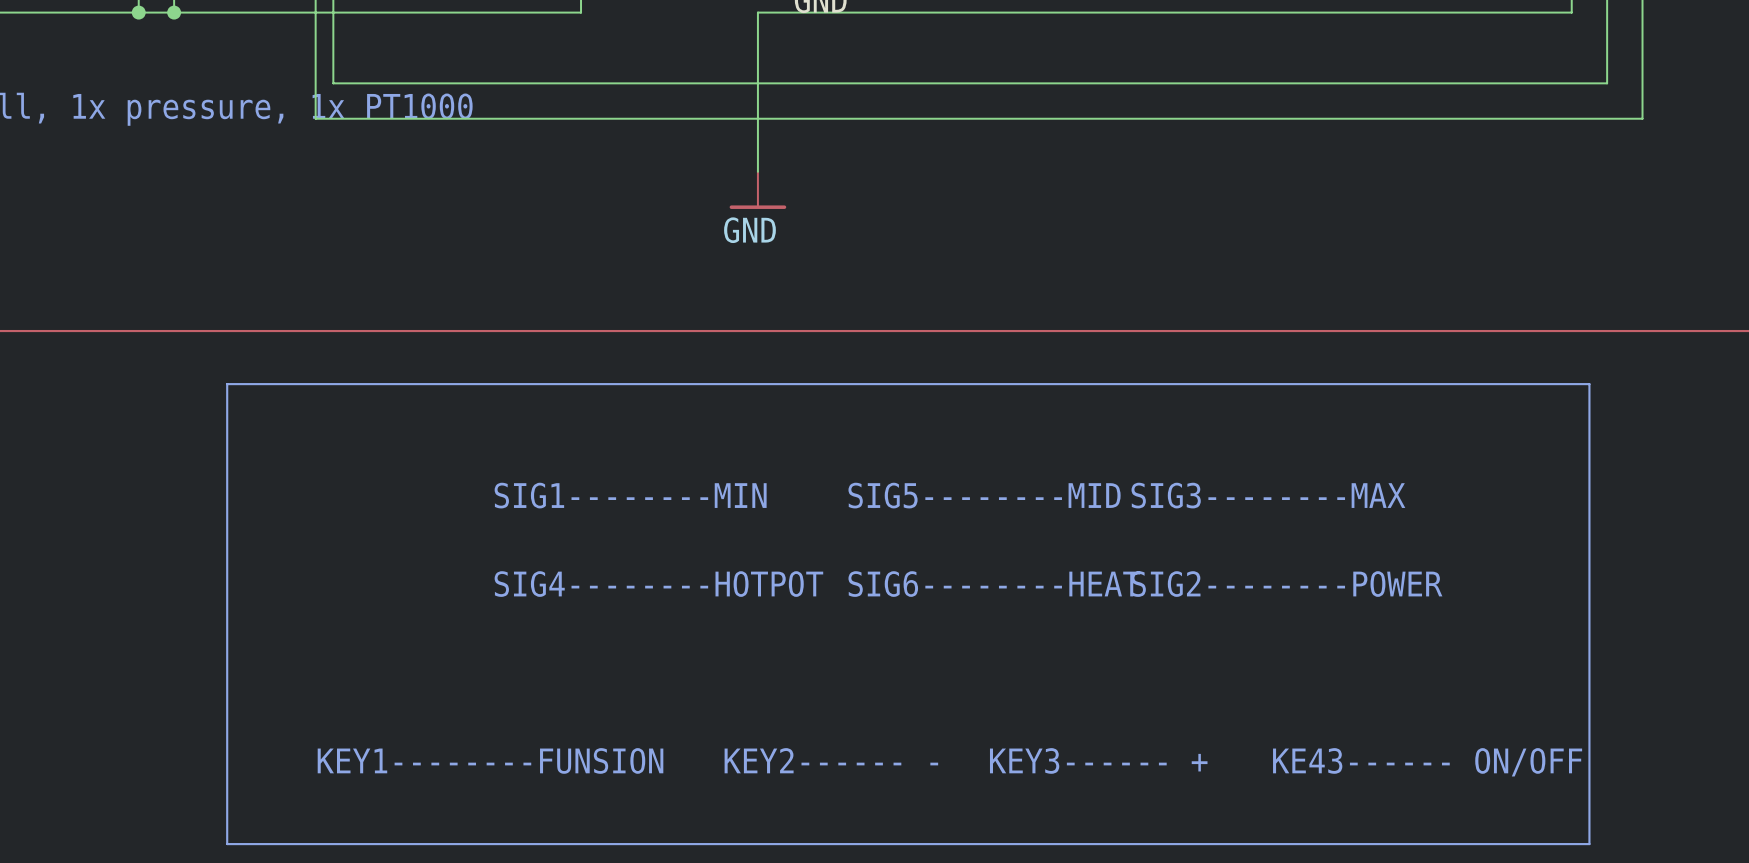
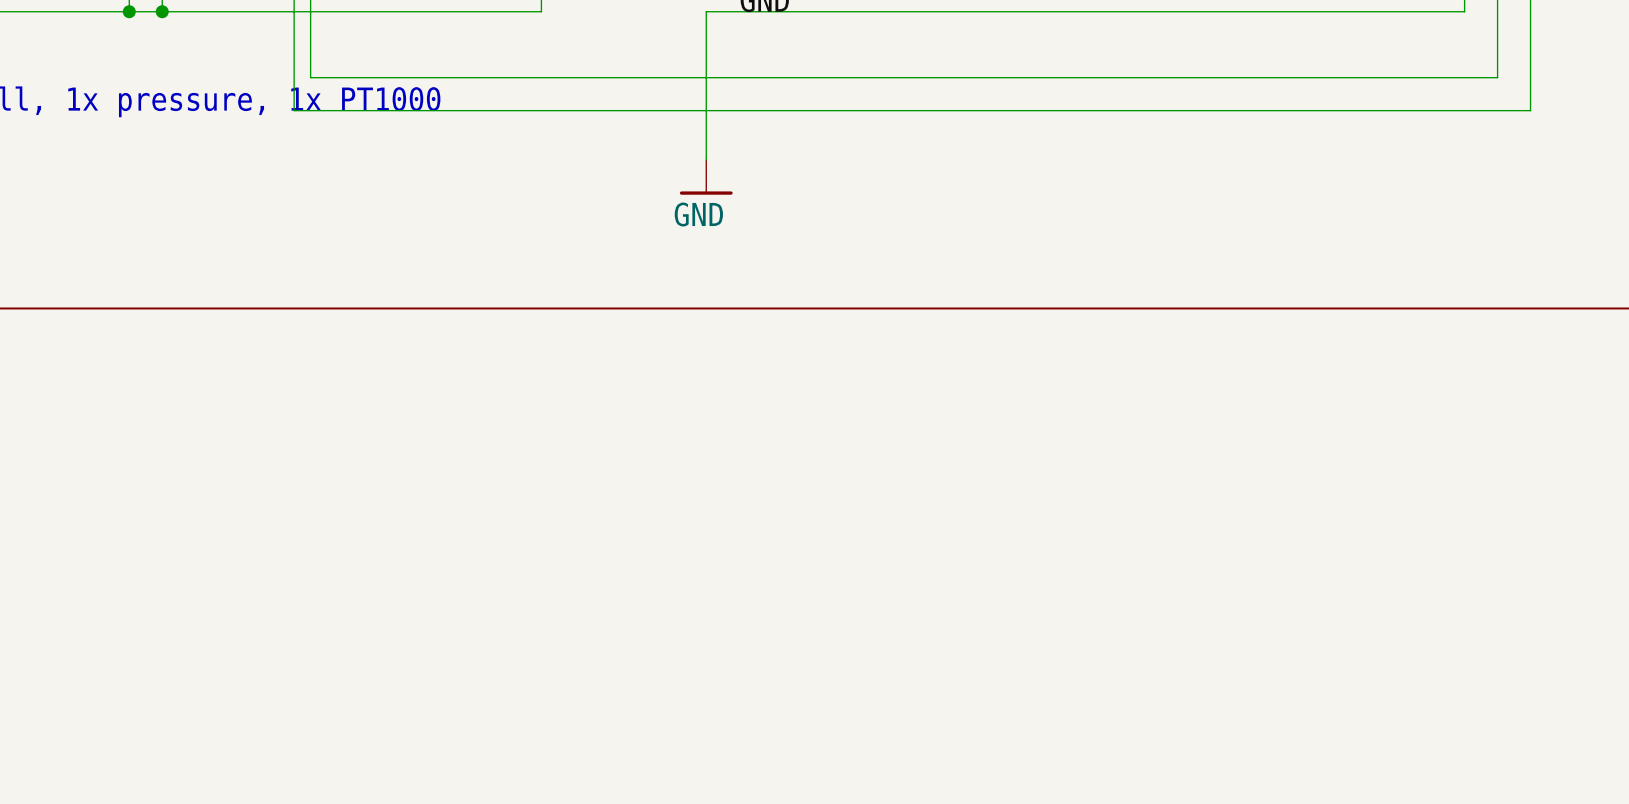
line: (227, 384) (1589, 384) (1589, 844) (227, 844) (227, 384) -> none
text: SIG1--------MIN (630, 495) -> none
text: SIG5--------MID (984, 495) -> none
text: SIG3--------MAX (1268, 495) -> none
text: SIG4--------HOTPOT (658, 584) -> none
text: SIG6--------HEAT (994, 584) -> none
text: SIG2--------POWER (1286, 584) -> none
text: KEY1--------FUNSION (490, 760) -> none
text: KEY2------ - (831, 760) -> none
text: KEY3------ + (1098, 760) -> none
text: KE43------ ON/OFF (1427, 762) -> none

